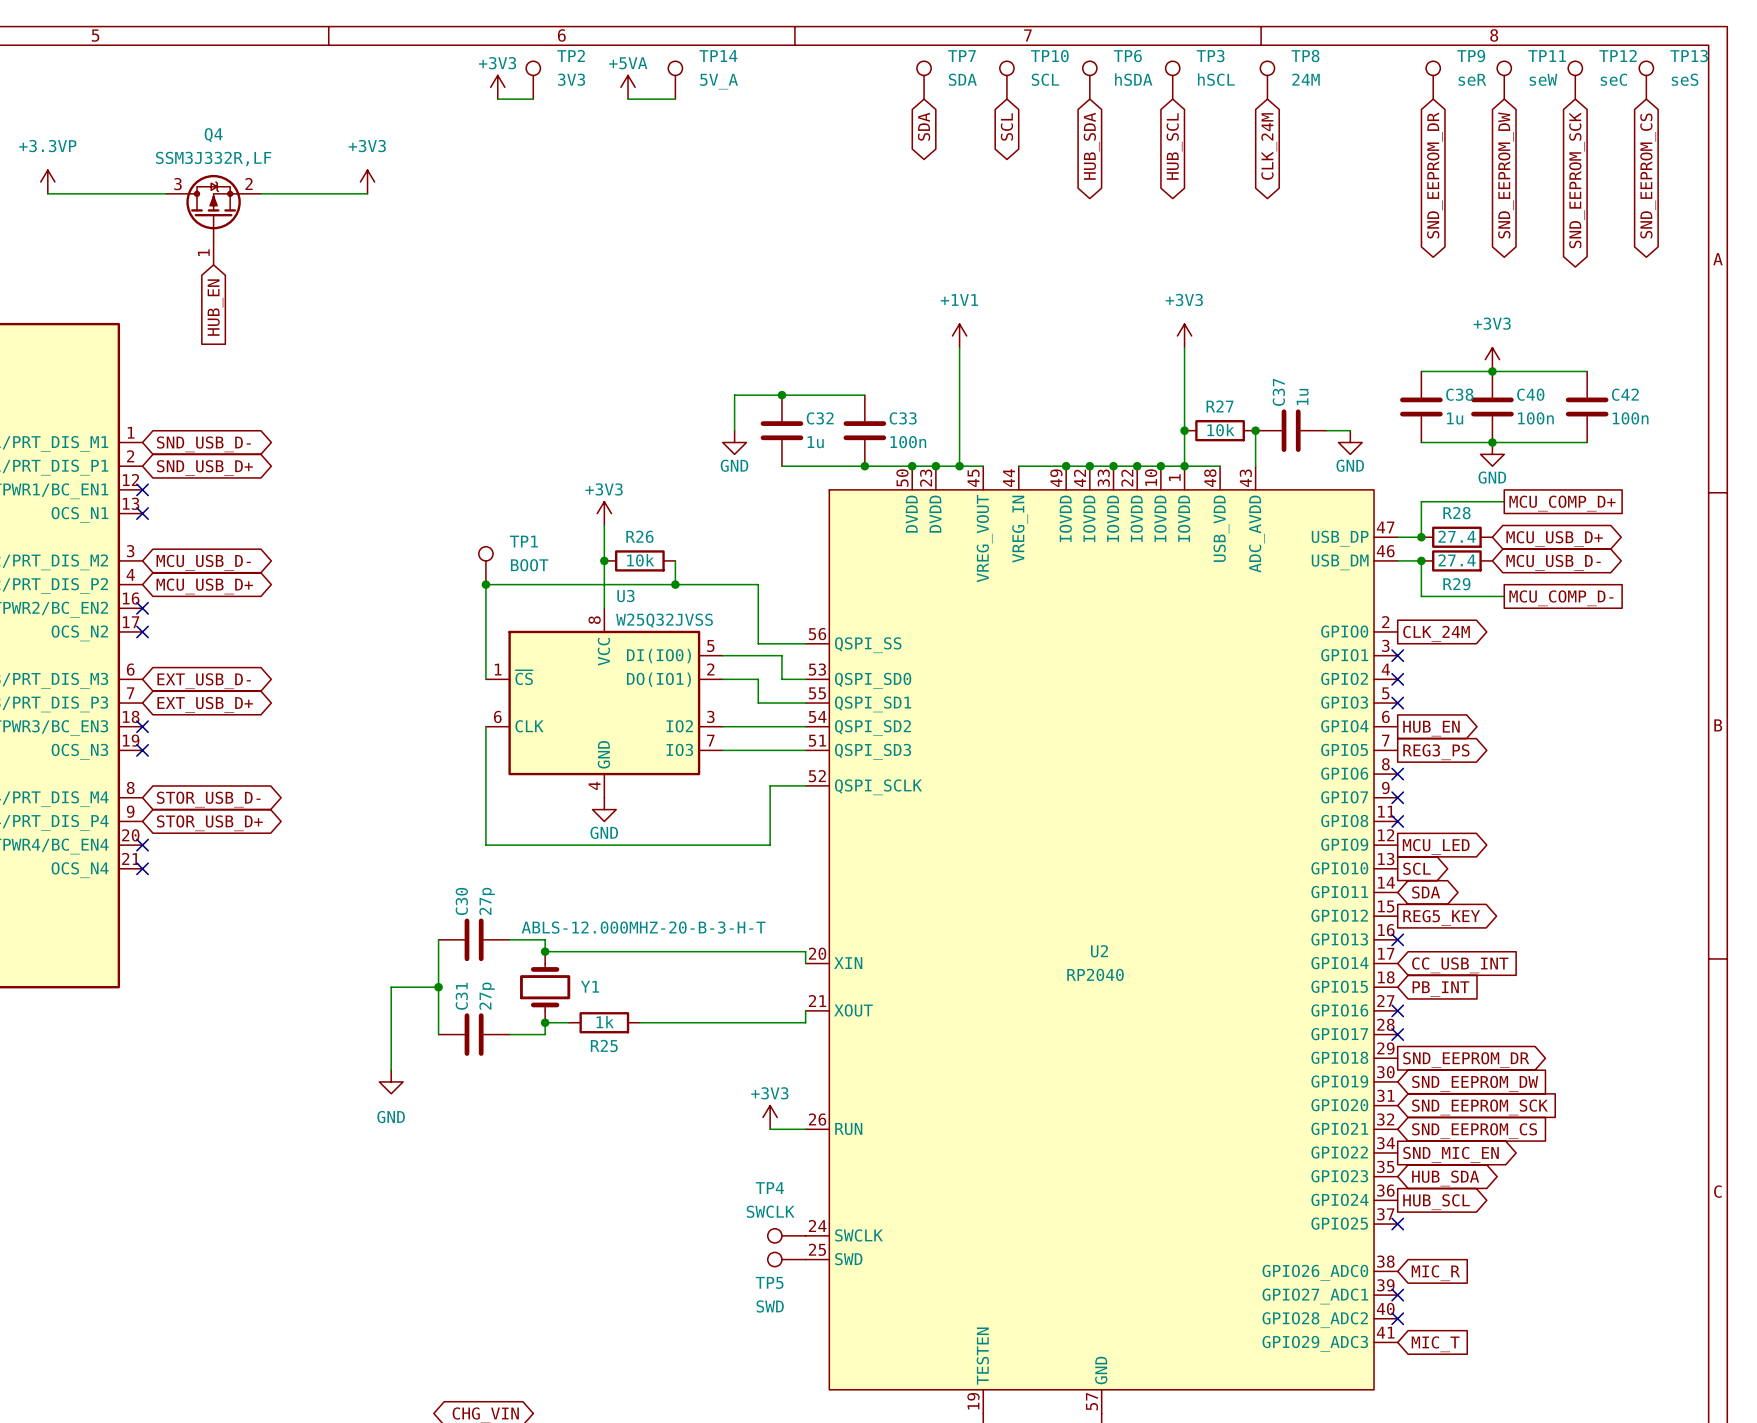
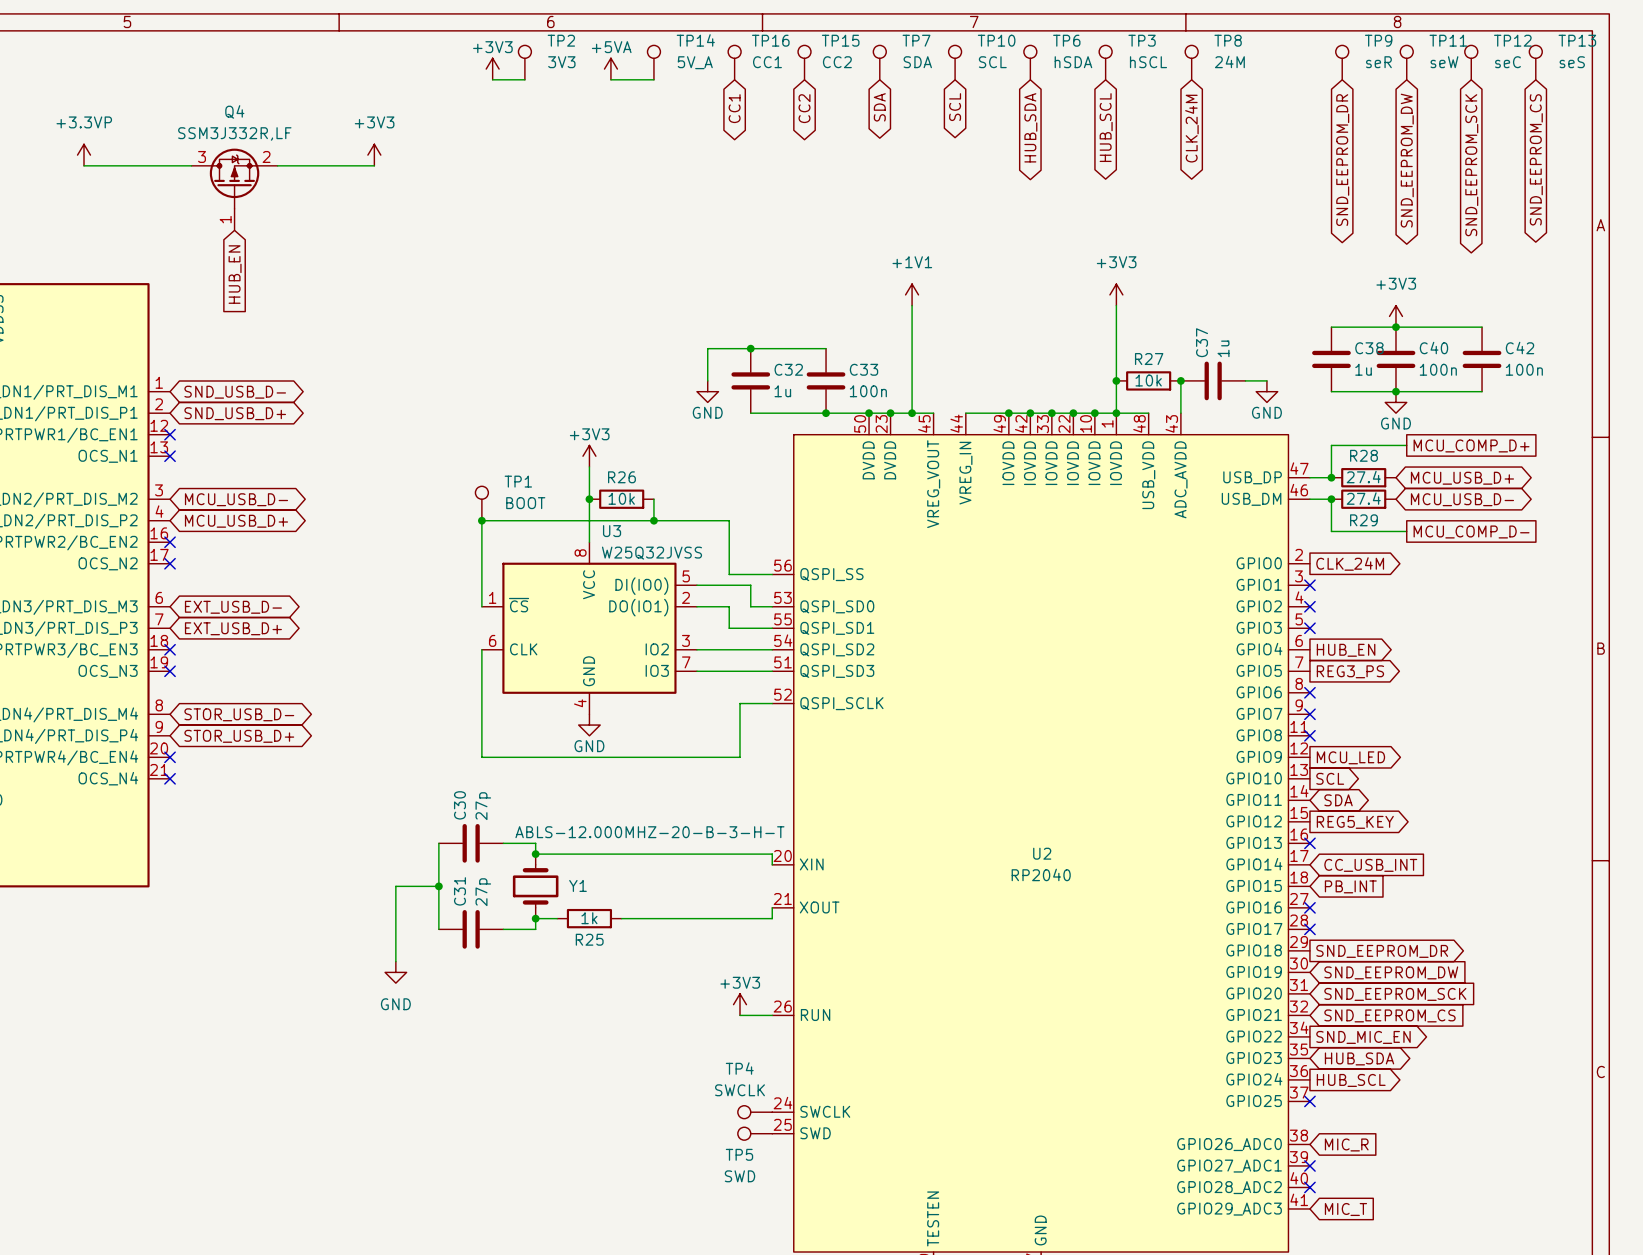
TP16: none -> CC1 (734, 62)
TP15: none -> CC2 (804, 62)
global label: none -> CC1 (734, 108)
global label: none -> CC2 (804, 108)

